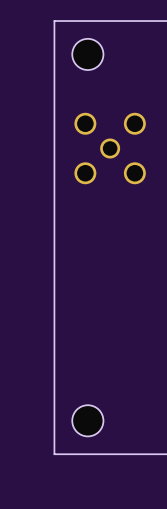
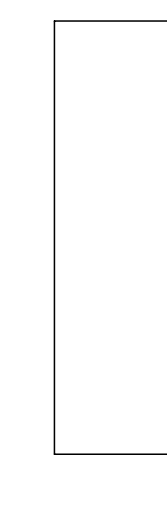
part: (87, 54) -> none
part: (110, 148) -> none
part: (87, 420) -> none

